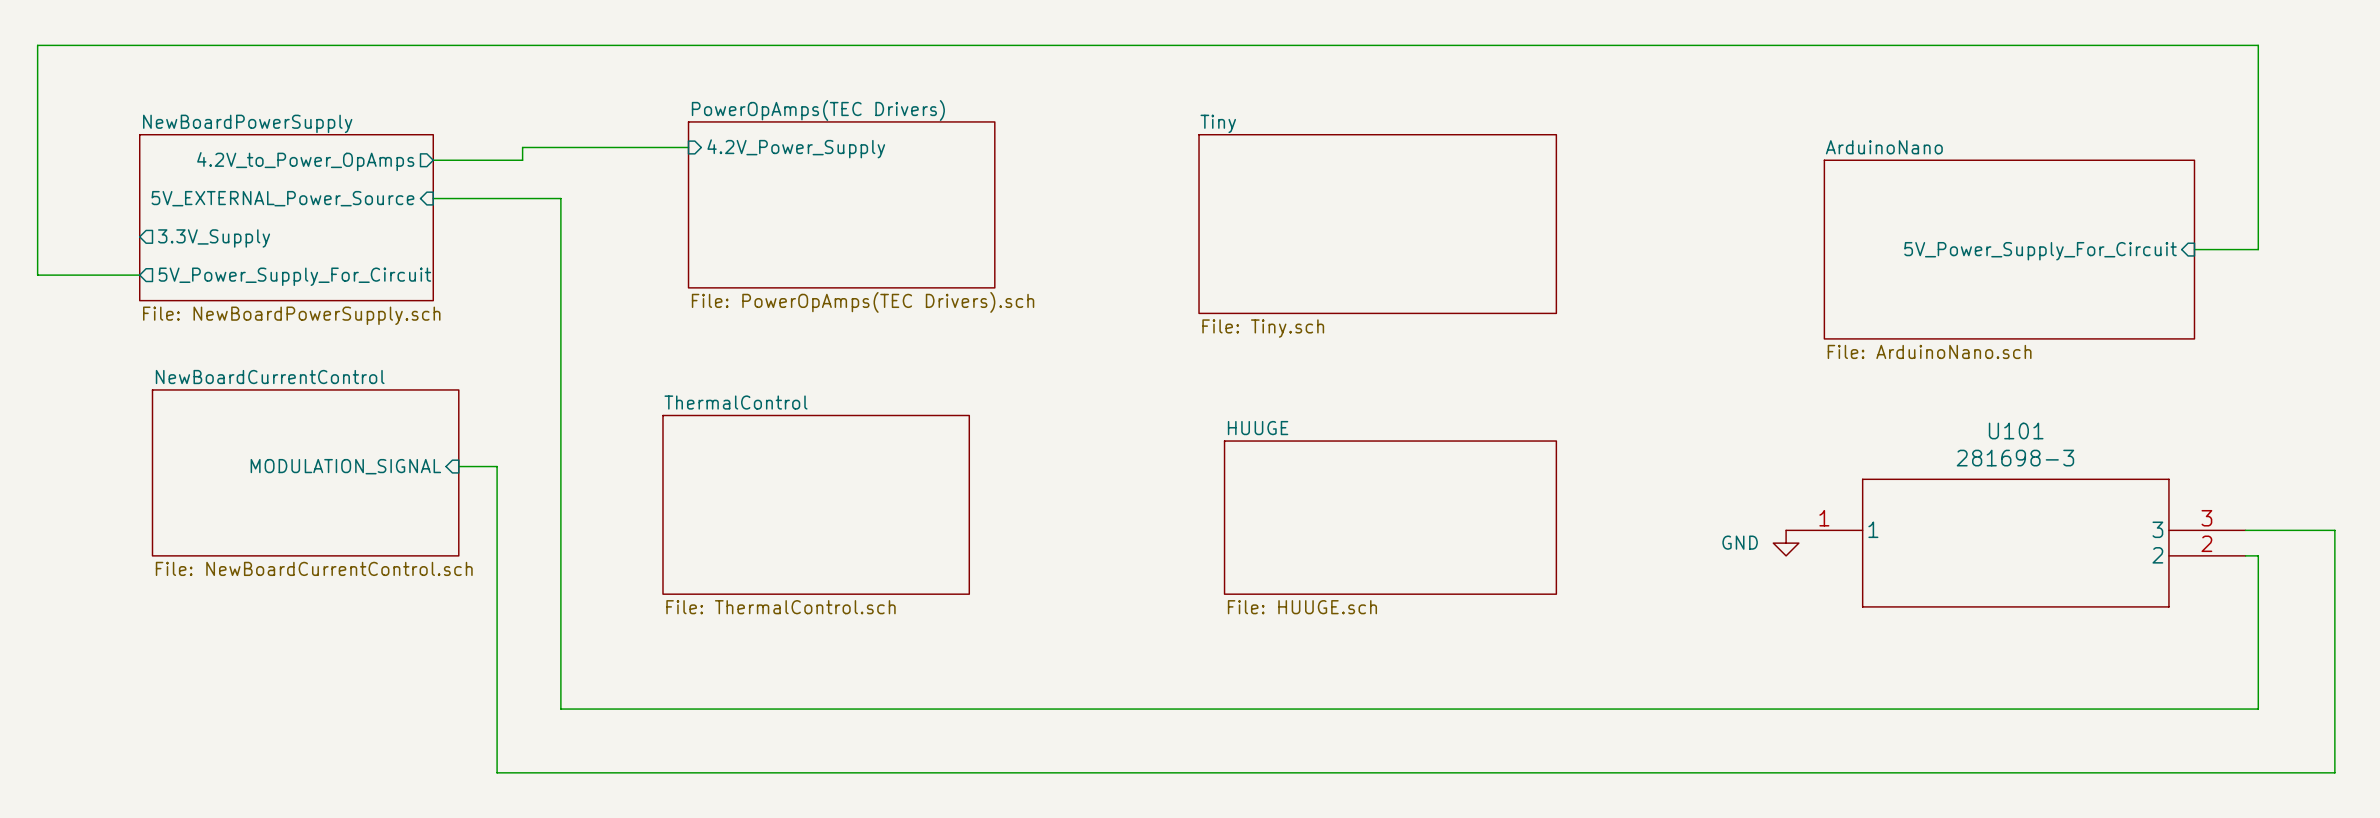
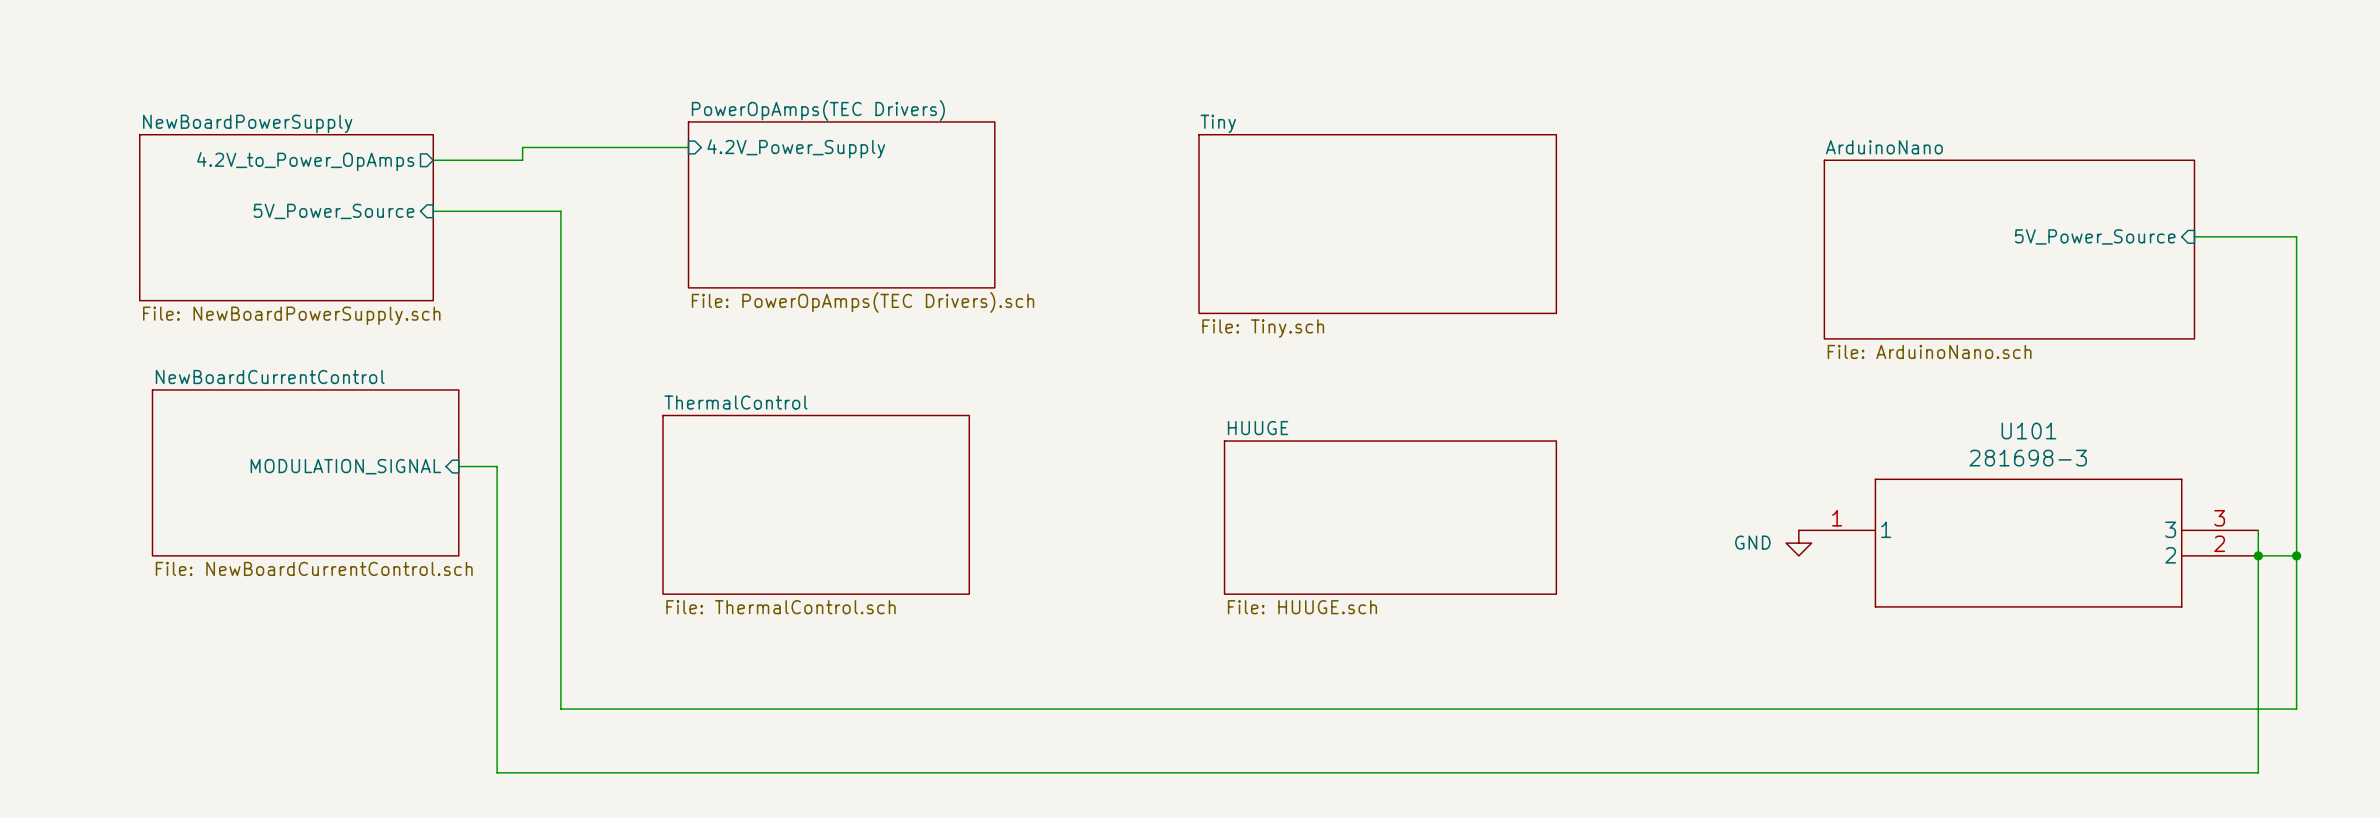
sheet pin: 5V_EXTERNAL_Power_Source (282, 198) -> 5V_Power_Source (334, 211)
wire: (433, 198) (560, 198) (560, 211) -> (433, 211) (560, 211)
sheet pin: 3.3V_Supply (214, 238) -> none
wire: (2194, 249) (2258, 249) (2258, 45) (37, 45) (37, 275) (139, 275) -> none
sheet pin: 5V_Power_Supply_For_Circuit (2040, 251) -> 5V_Power_Source (2095, 236)
sheet pin: 5V_Power_Supply_For_Circuit (294, 276) -> none
wire: (2245, 530) (2334, 530) (2334, 772) (2258, 772) -> (2194, 236) (2296, 236) (2296, 709) (2258, 709) (2258, 772)
wire: none -> (2258, 530) (2258, 555) (2296, 555)
power symbol position: GND (1786, 543) -> GND (1798, 543)
U101 position: (2015, 543) -> (2028, 543)
junction: none -> (2258, 555)
junction: none -> (2296, 555)

